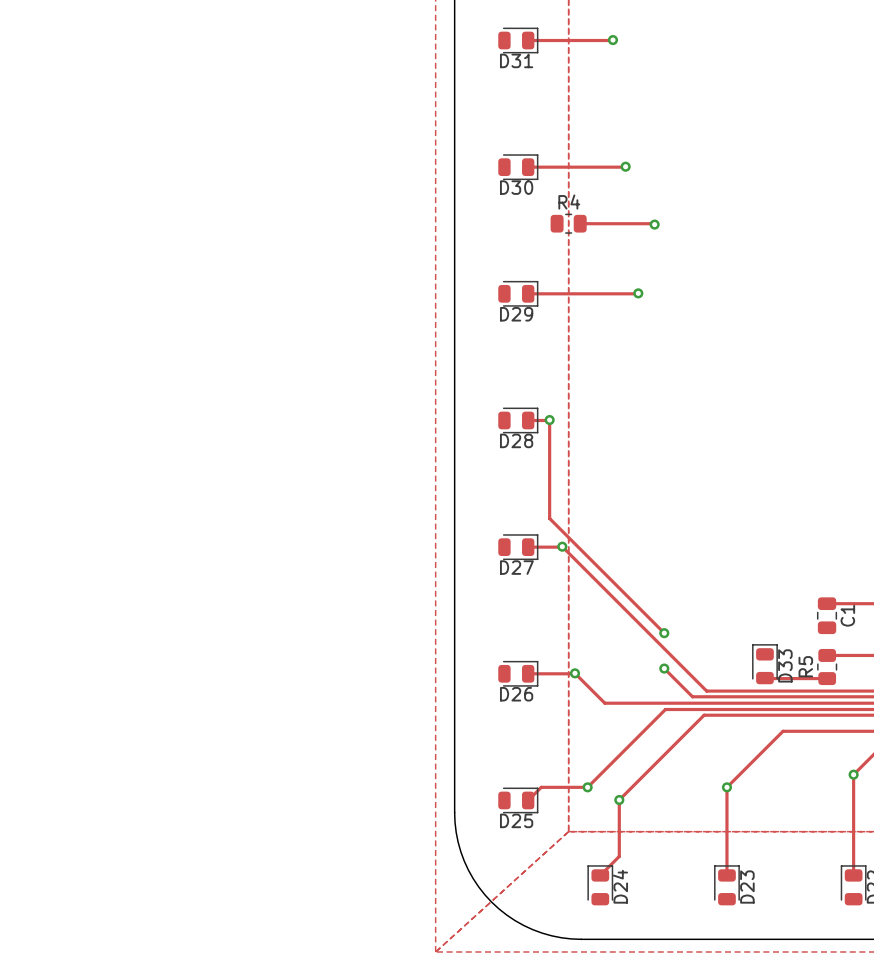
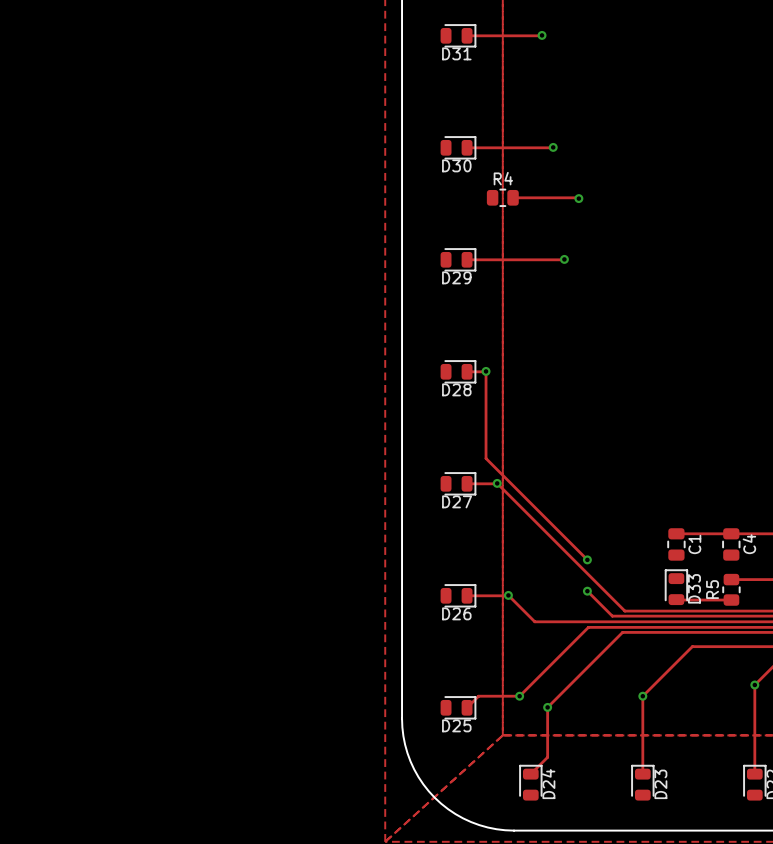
track: none -> (676, 533) (732, 533)
C1: none -> (676, 544)
C1 name: C1 (847, 615) -> C4 (749, 544)

